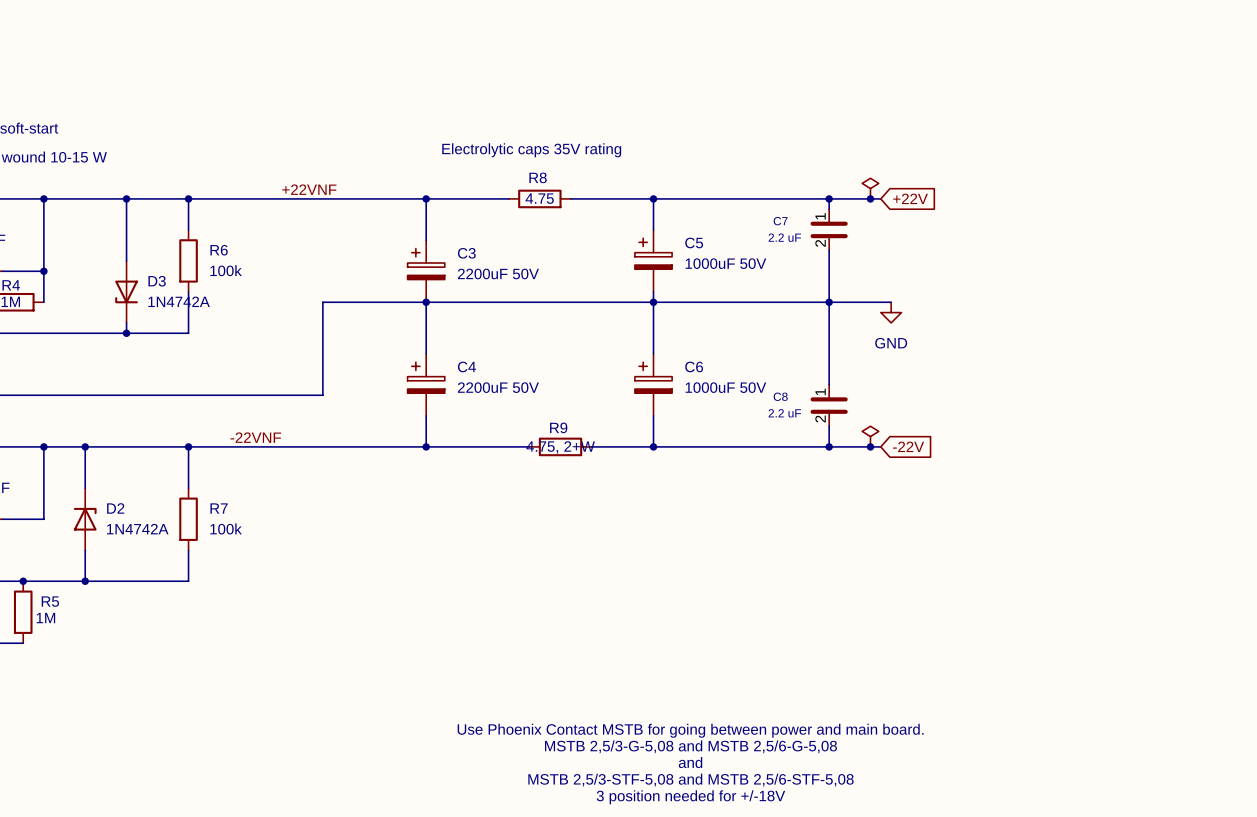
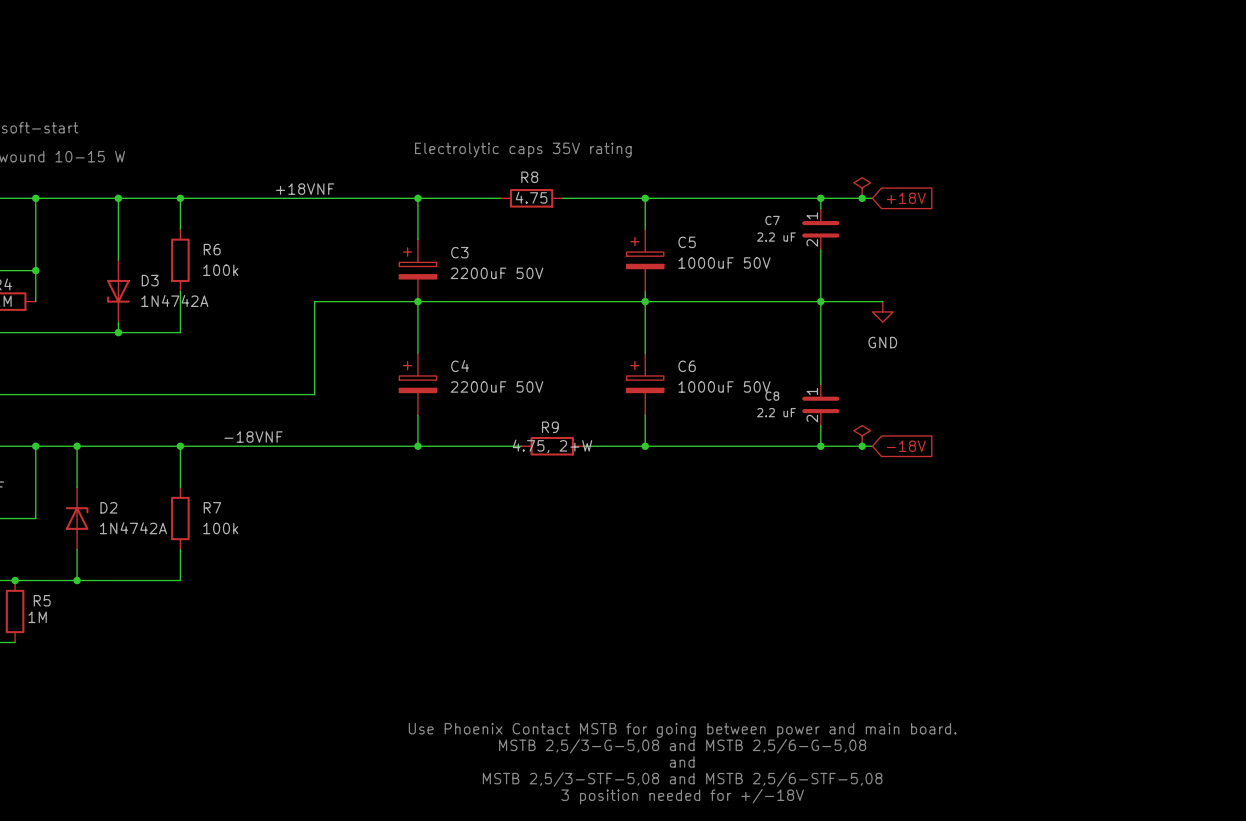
label: +22VNF (309, 189) -> +18VNF (305, 189)
global label: +22V (910, 198) -> +18V (906, 198)
label: -22VNF (255, 437) -> -18VNF (253, 437)
global label: -22V (908, 446) -> -18V (906, 446)

